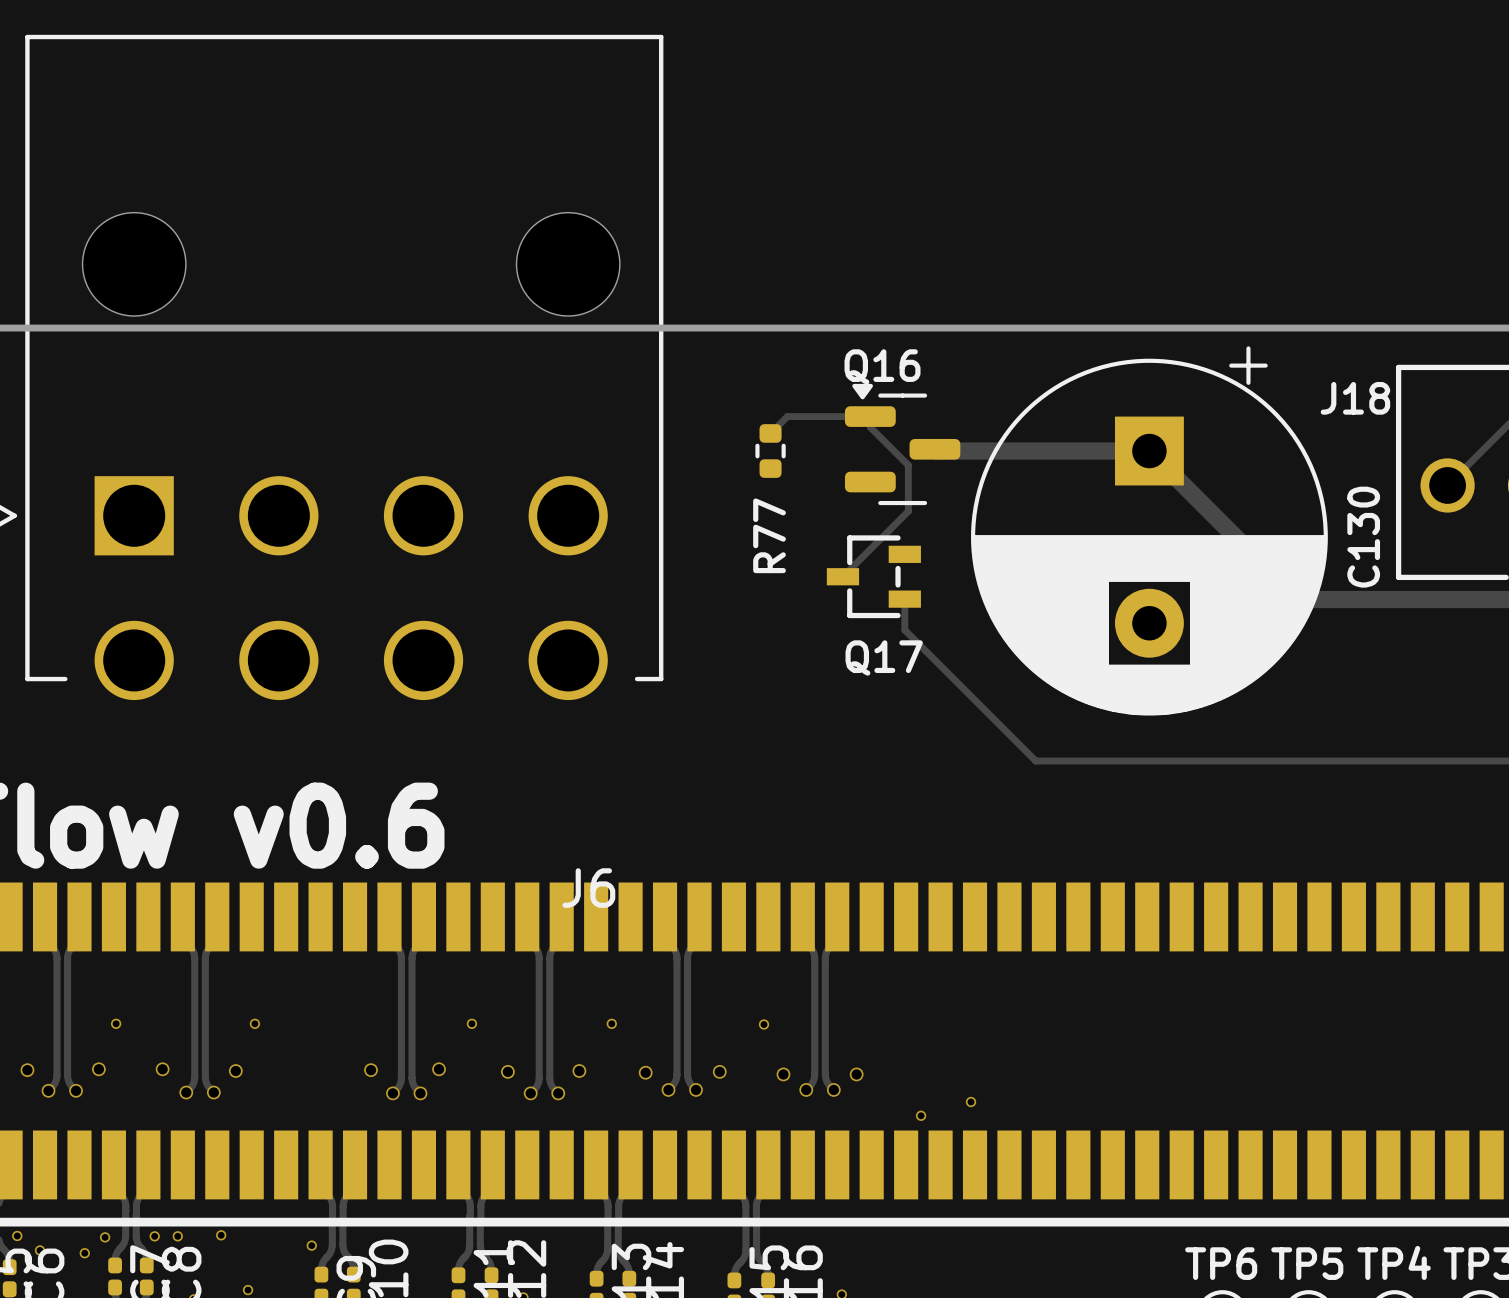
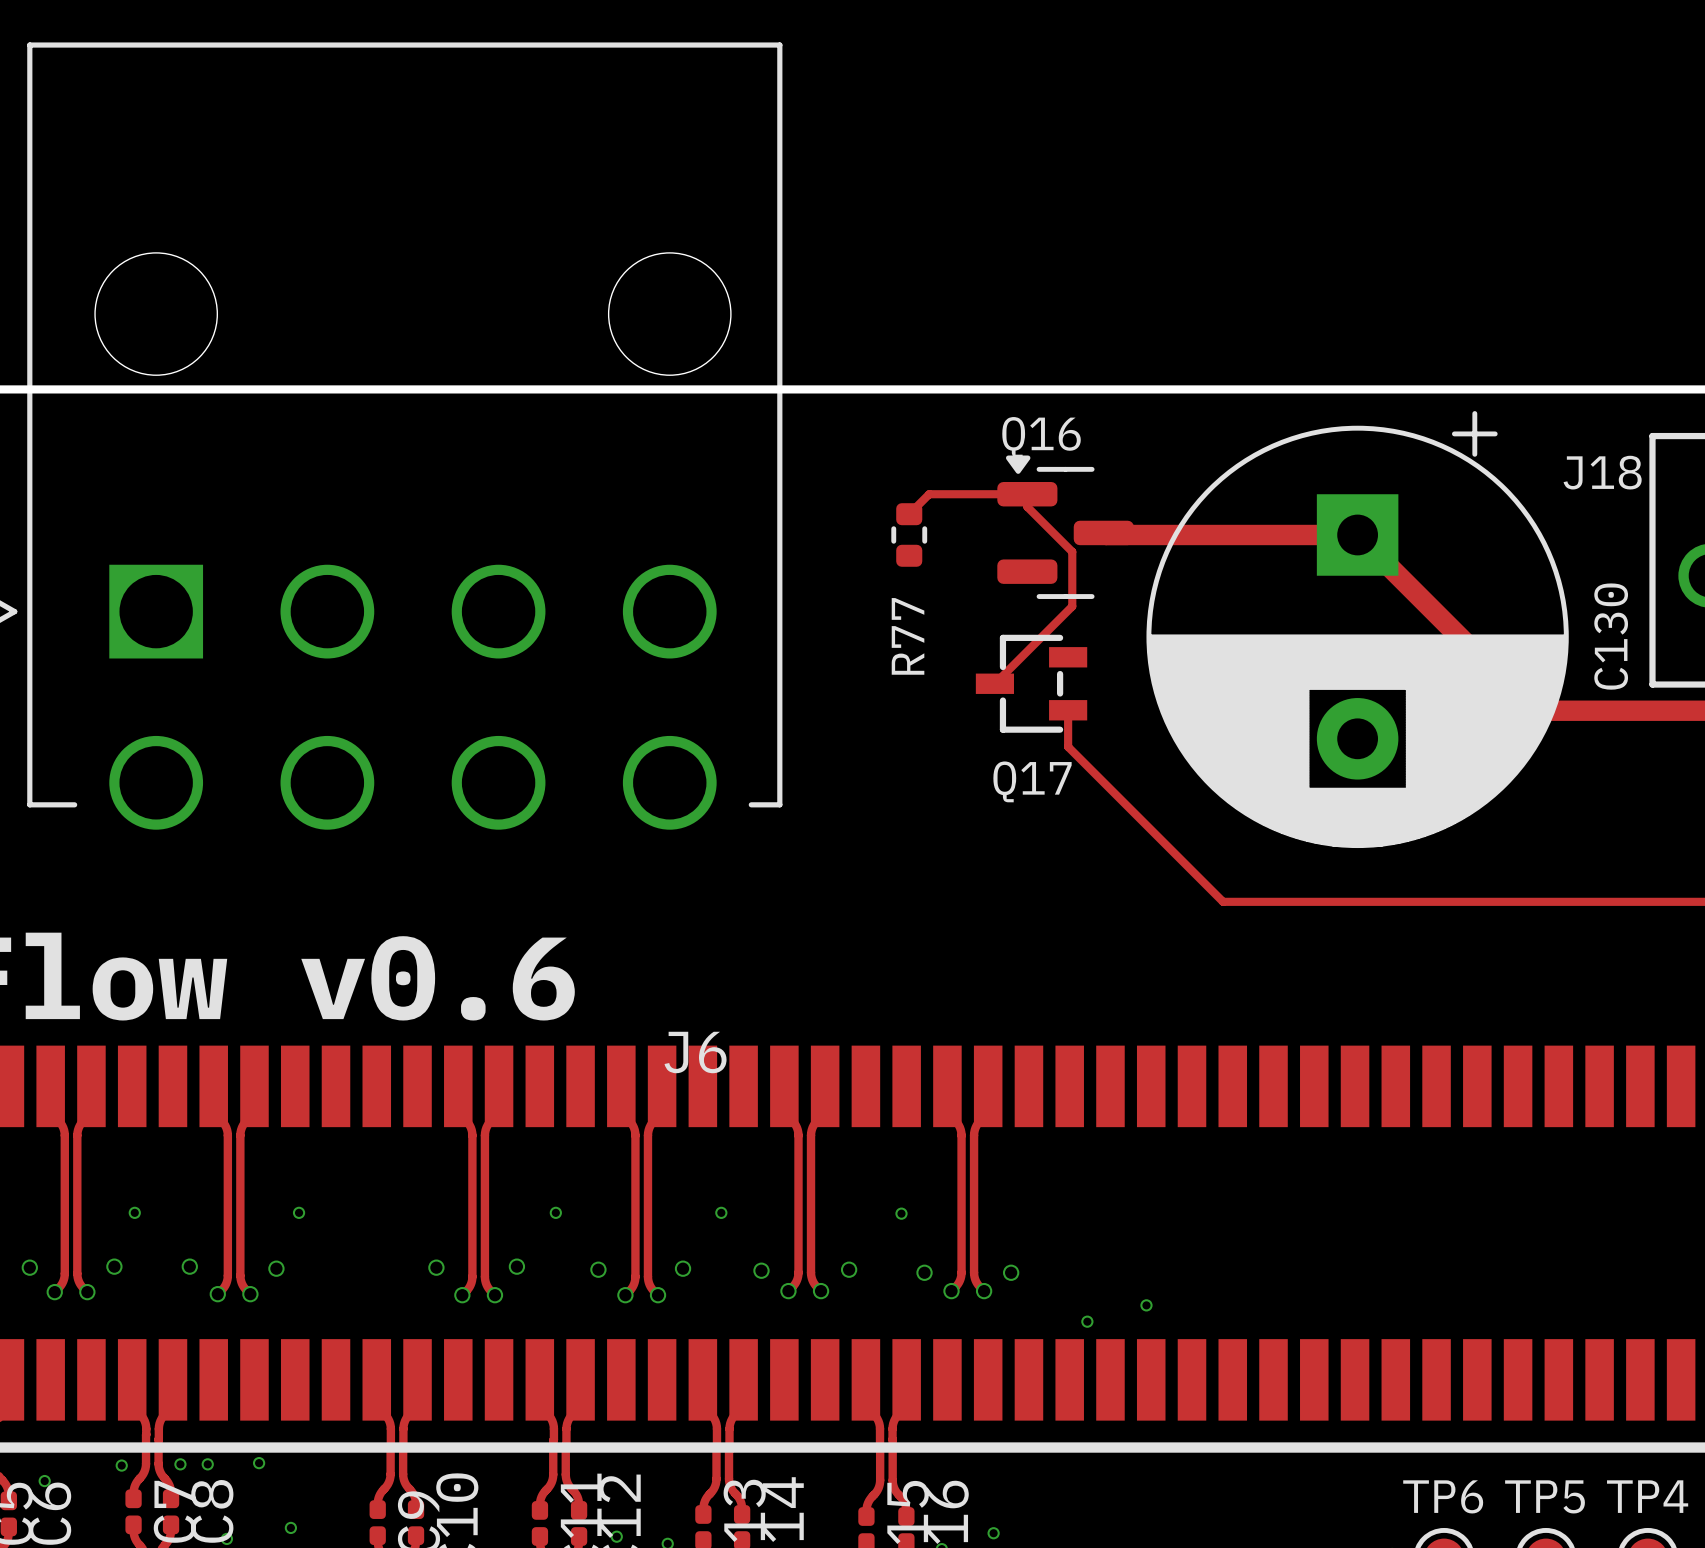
via: (17, 1235) -> none
via: (311, 1245) -> none
via: (84, 1253) -> none

